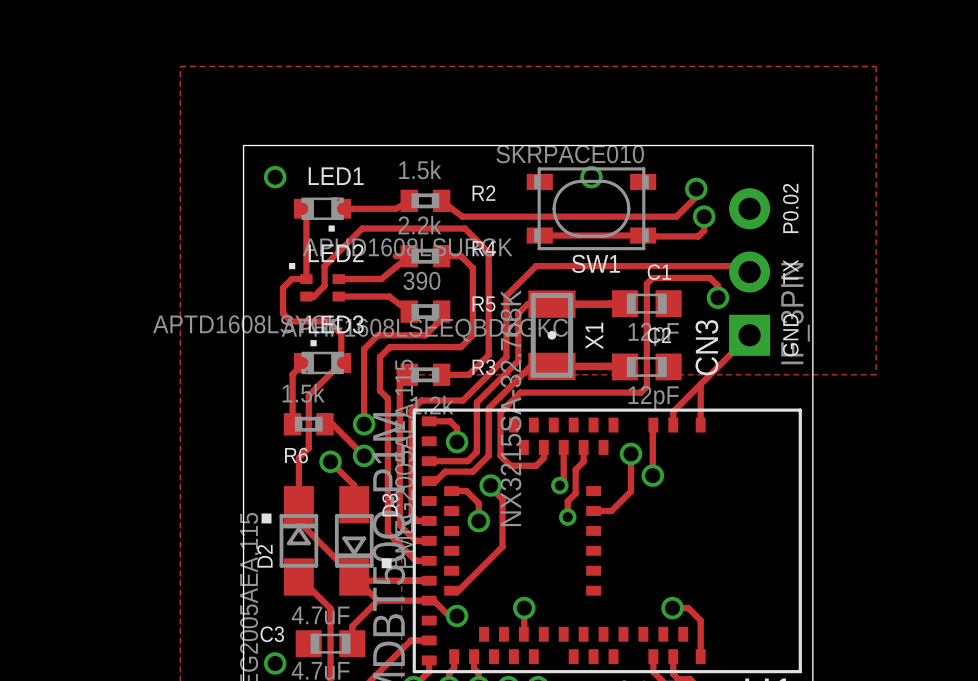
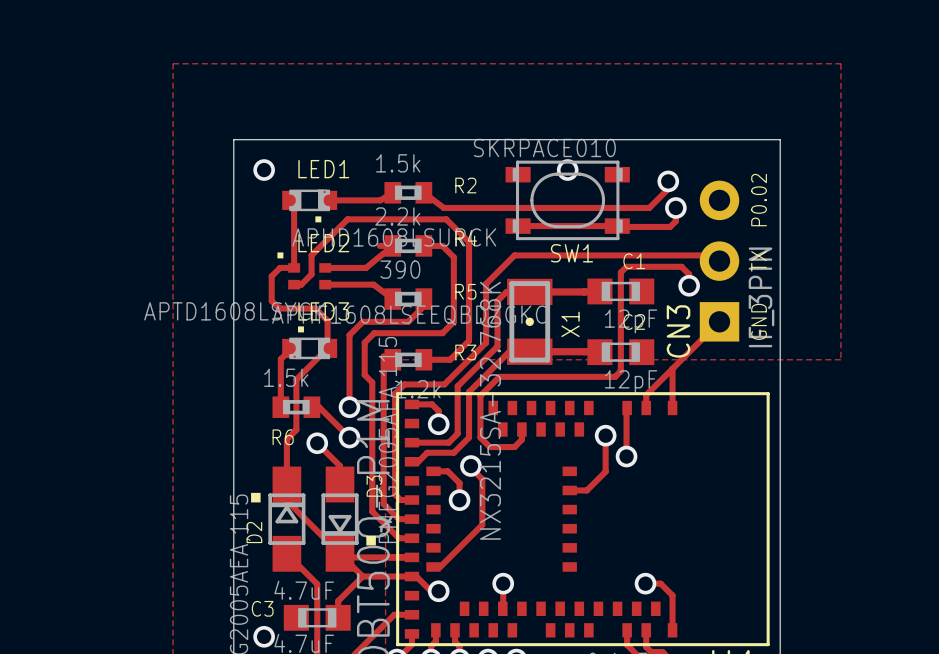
track: (563, 447) (563, 481) (559, 485) -> none
track: (583, 447) (583, 461) (575, 469) (575, 493) (567, 501) (567, 517) -> none
via: (559, 485) -> none
via: (567, 517) -> none

